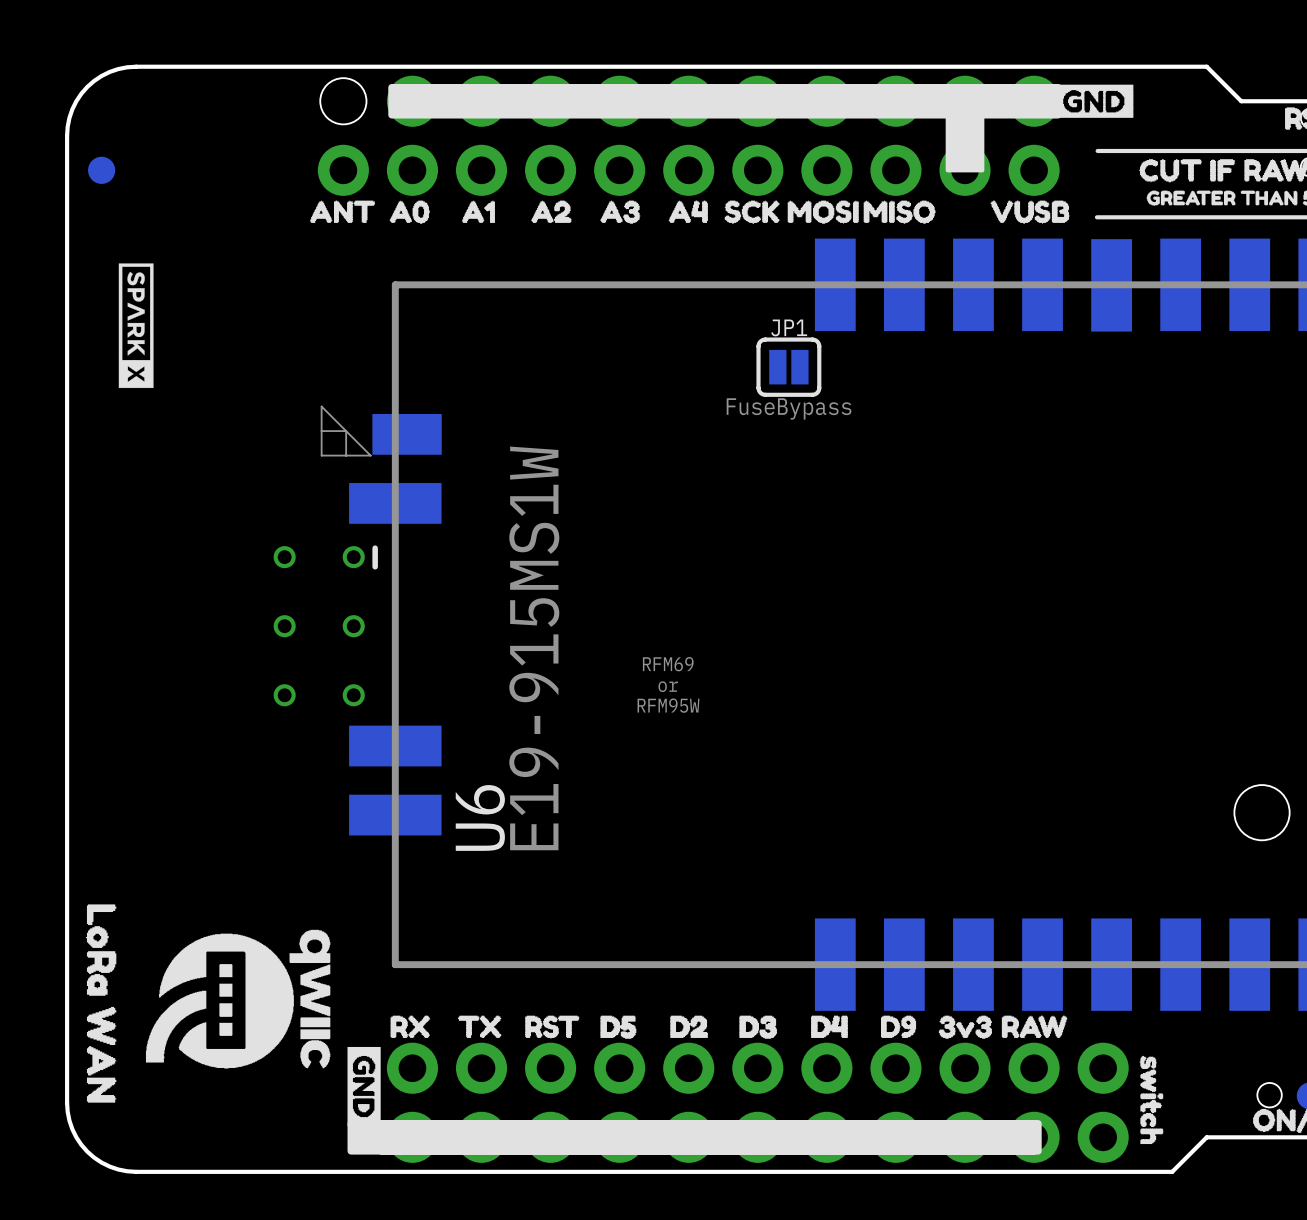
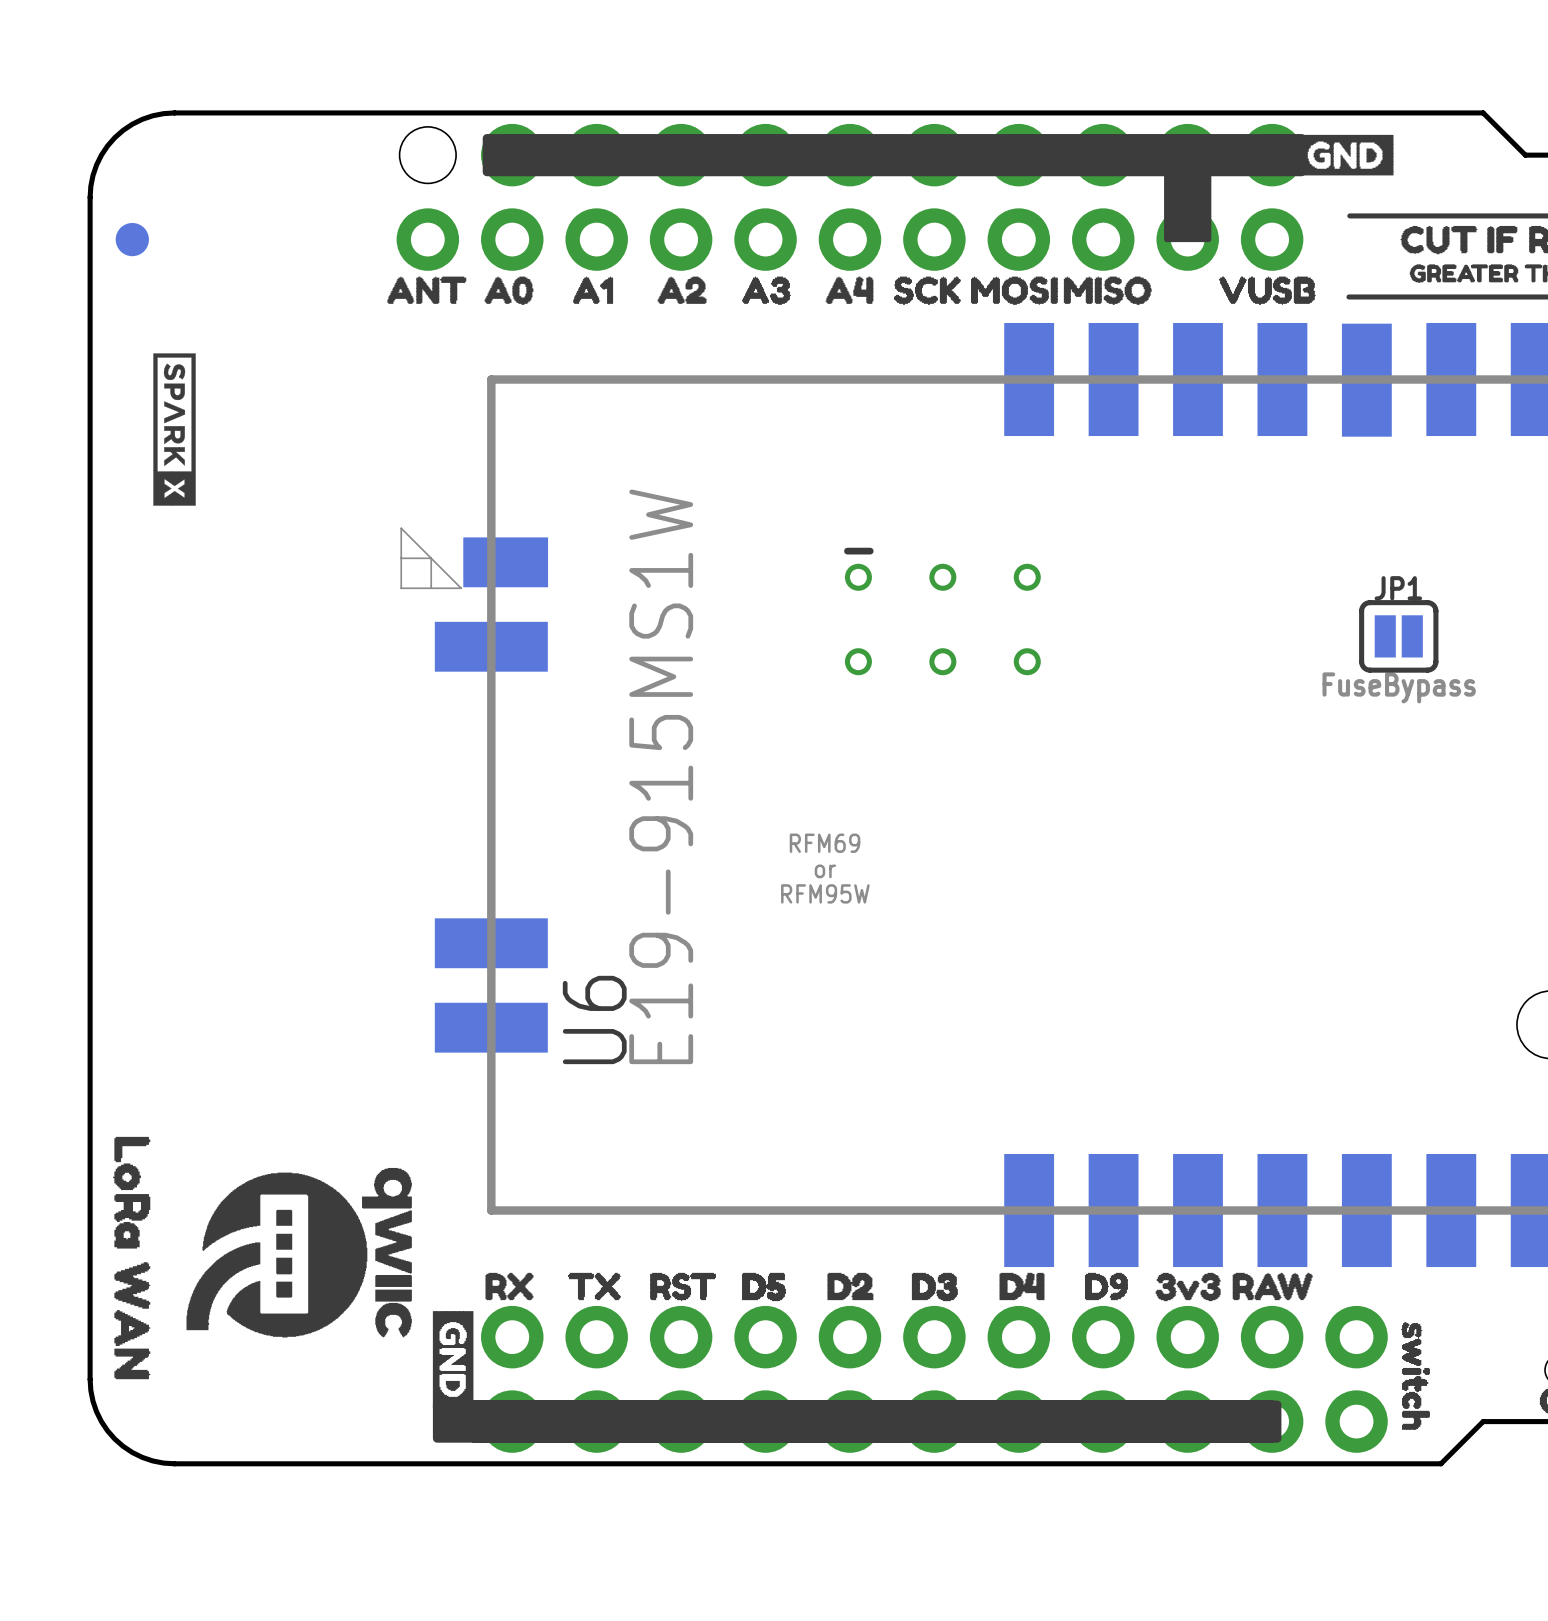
JP1 position: (788, 367) -> (1398, 636)
part rotation: 0° (325, 625) -> 90° counterclockwise (942, 611)
part position: (325, 625) -> (942, 611)

